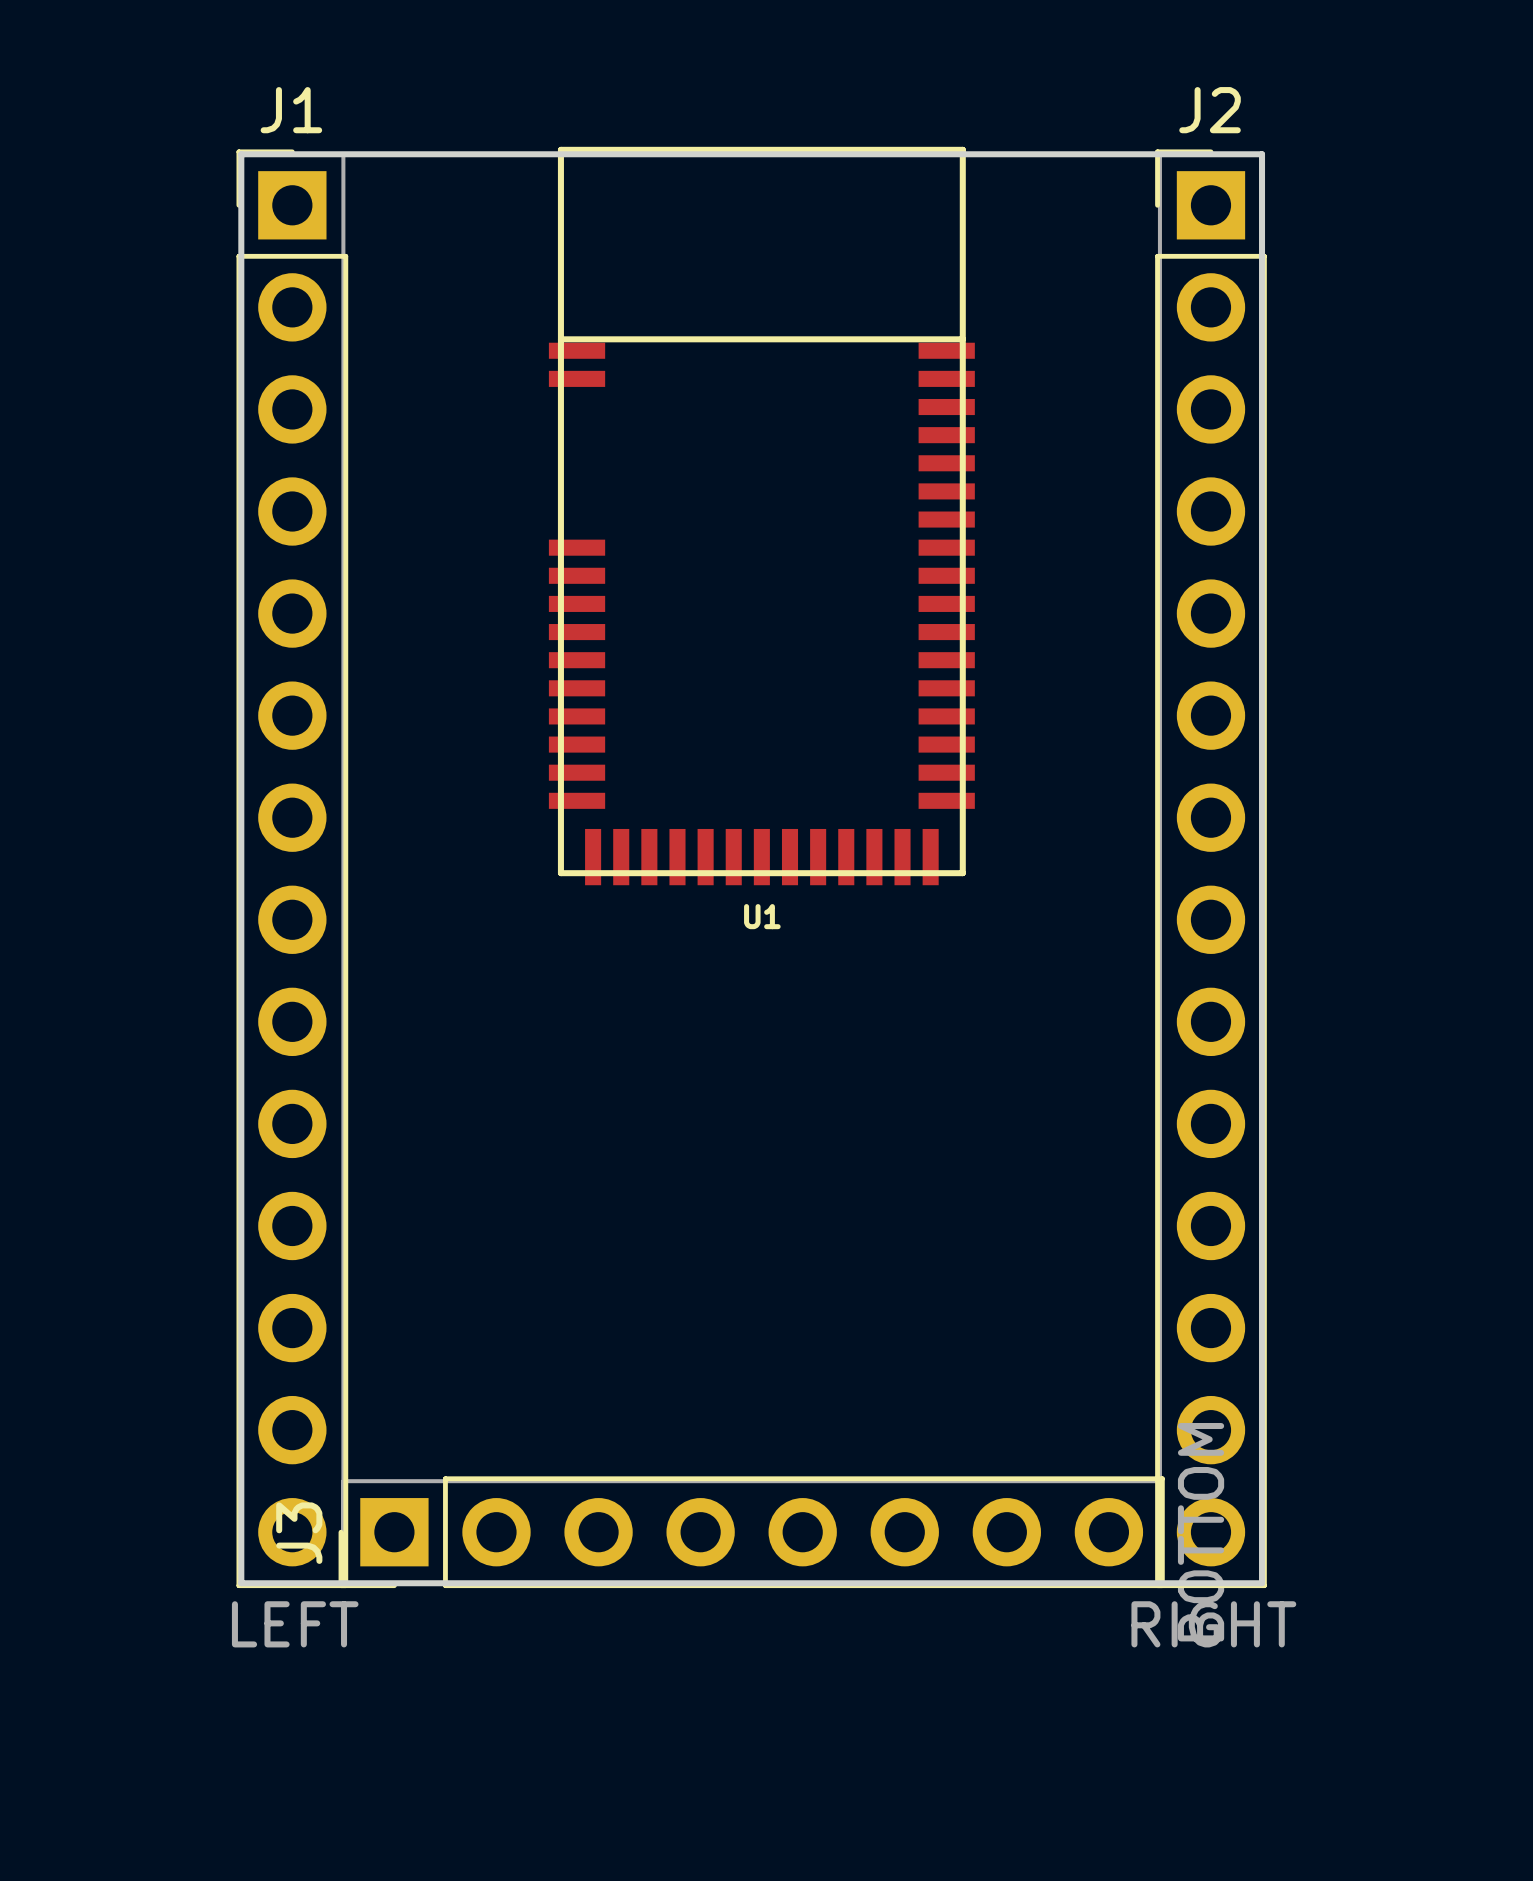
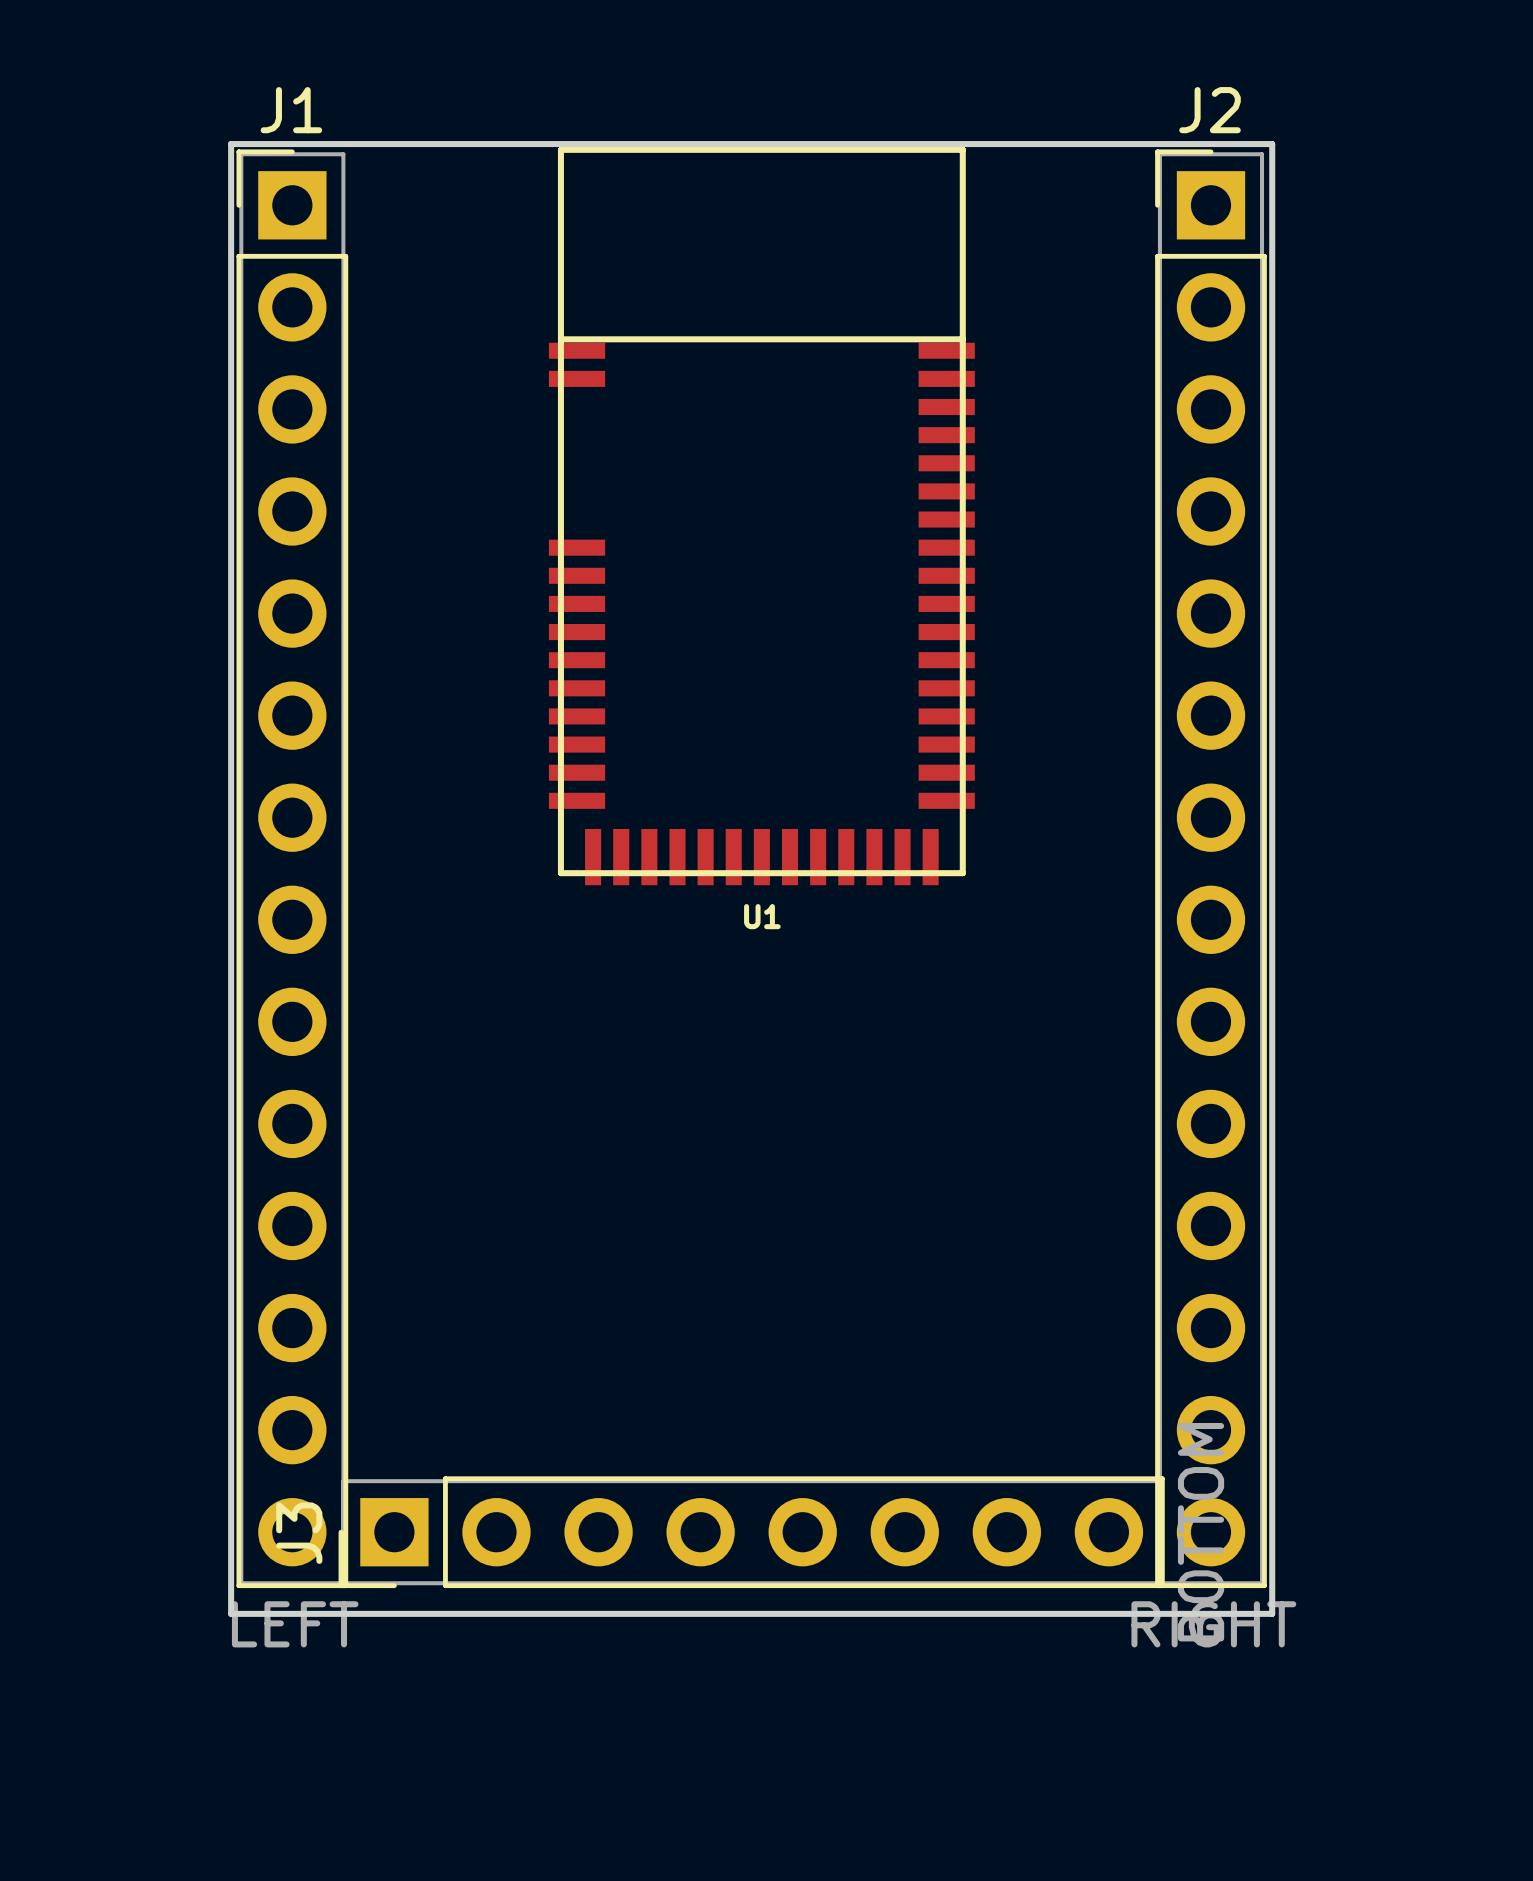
board edge: (241, 154) (1262, 154) (1262, 1583) (241, 1583) (241, 154) -> (231, 144) (231, 1613) (1272, 1613) (1272, 144) (231, 144)

